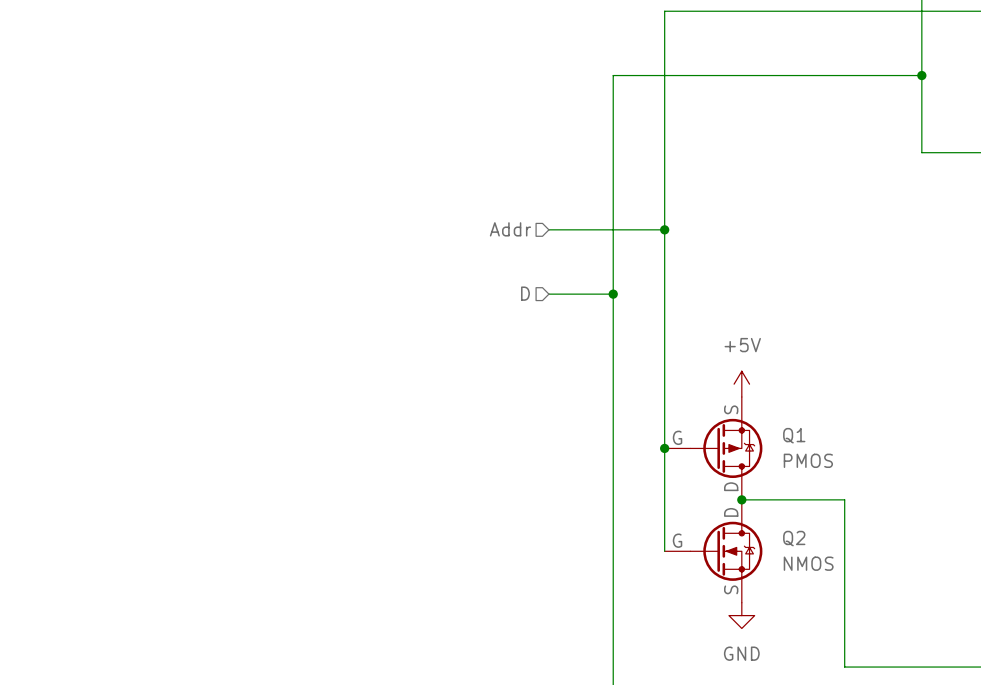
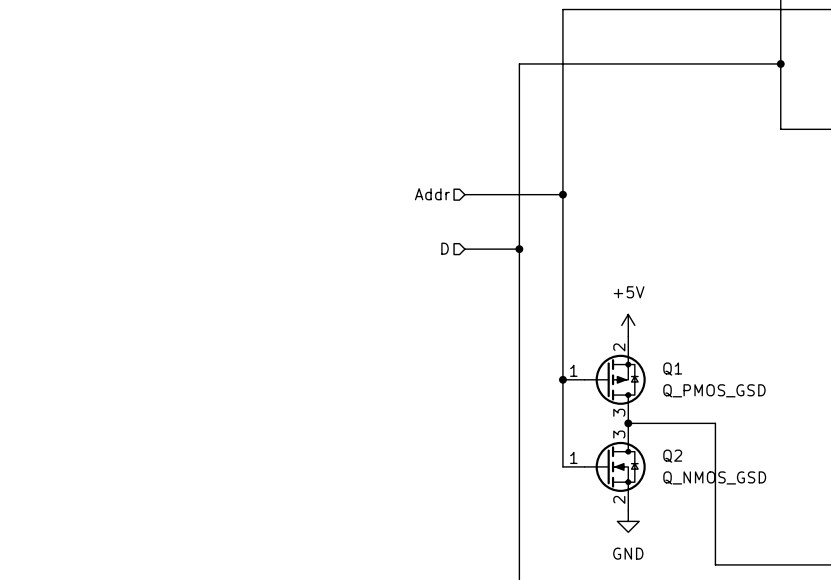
Q1 symbol: [664, 397, 763, 500] -> [562, 336, 646, 424]
Q1 value: PMOS (808, 460) -> Q_PMOS_GSD (714, 390)
Q2 symbol: [664, 499, 763, 603] -> [562, 423, 646, 511]
Q2 value: NMOS (808, 563) -> Q_NMOS_GSD (714, 477)

